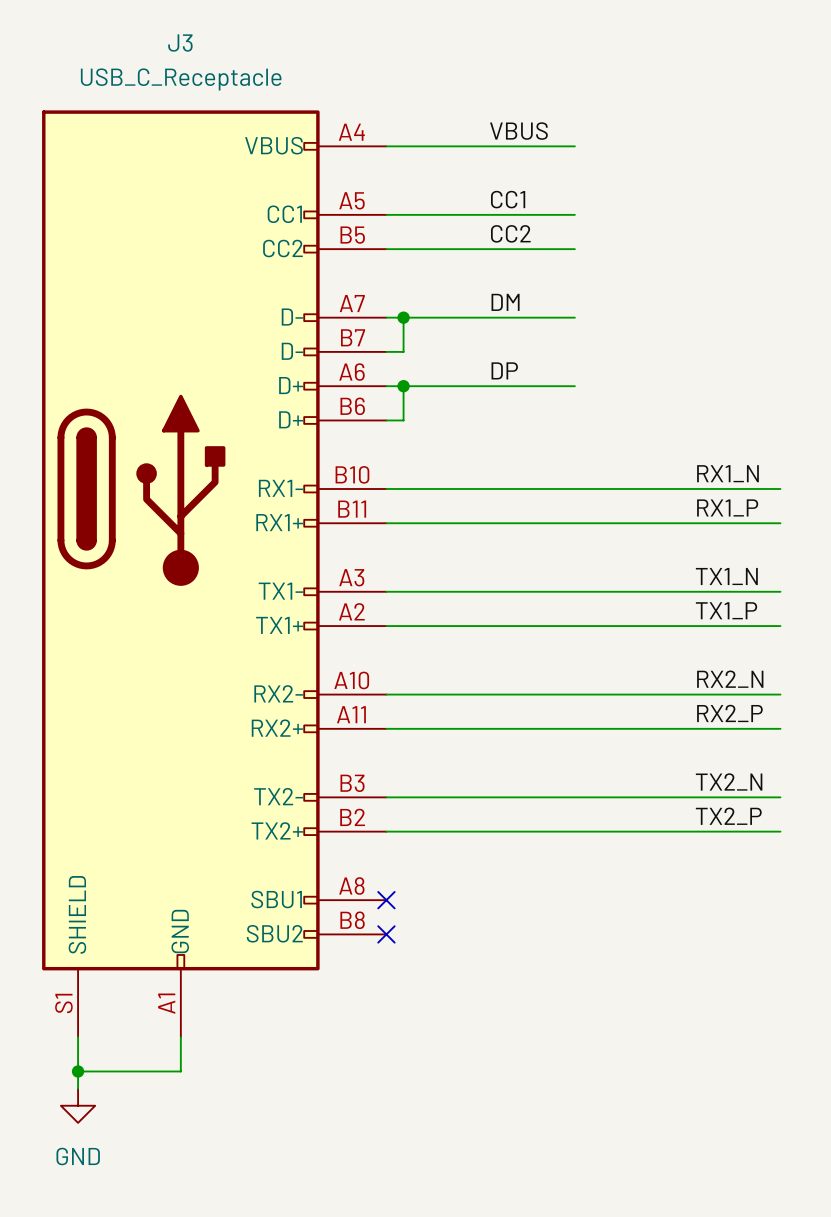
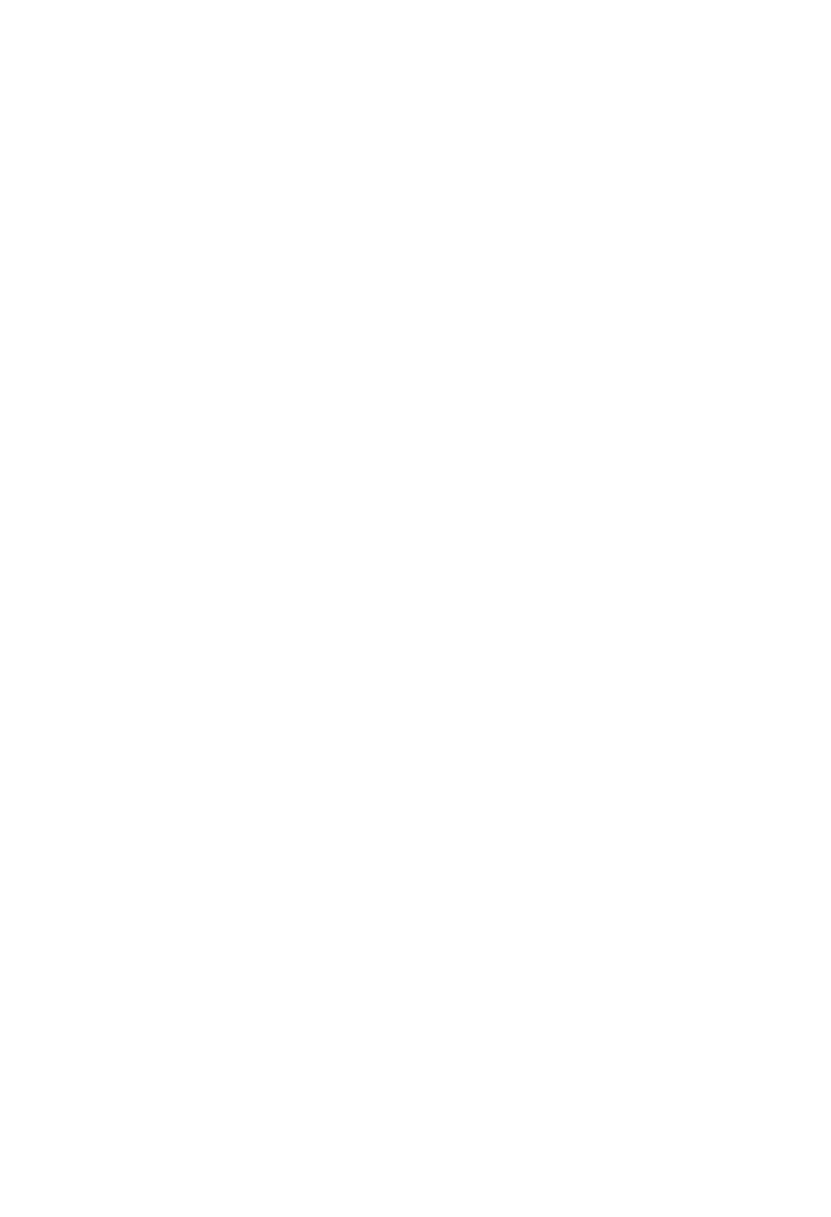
label: VBUS (518, 131) -> none
wire: (386, 146) (574, 146) -> none
label: CC1 (508, 199) -> none
wire: (386, 214) (574, 214) -> none
label: CC2 (510, 233) -> none
wire: (386, 249) (574, 249) -> none
label: DM (505, 302) -> none
wire: (386, 317) (574, 317) -> none
wire: (403, 317) (403, 351) (386, 351) -> none
junction: (403, 317) -> none
label: DP (504, 370) -> none
wire: (386, 386) (574, 386) -> none
wire: (403, 386) (403, 420) (386, 420) -> none
junction: (403, 386) -> none
label: RX1_N (727, 473) -> none
wire: (386, 488) (780, 488) -> none
label: RX1_P (727, 507) -> none
wire: (386, 523) (780, 523) -> none
J3: USB_C_Receptacle (214, 573) -> none
label: TX1_N (726, 576) -> none
wire: (386, 591) (780, 591) -> none
label: TX1_P (726, 610) -> none
wire: (386, 626) (780, 626) -> none
label: RX2_N (730, 679) -> none
wire: (386, 694) (780, 694) -> none
label: RX2_P (729, 713) -> none
wire: (386, 728) (780, 728) -> none
label: TX2_N (729, 781) -> none
wire: (386, 797) (780, 797) -> none
label: TX2_P (728, 816) -> none
wire: (386, 831) (780, 831) -> none
no-connect mark: (386, 900) -> none
no-connect mark: (386, 934) -> none
wire: (78, 1037) (78, 1088) -> none
wire: (180, 1037) (180, 1071) (78, 1071) -> none
junction: (78, 1071) -> none
power symbol: GND (78, 1105) -> none

